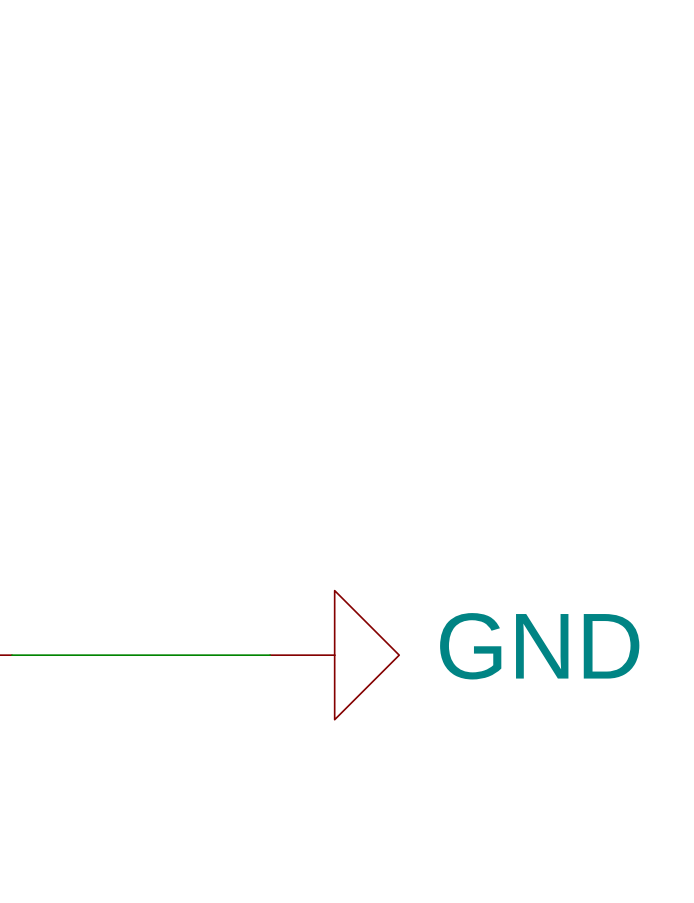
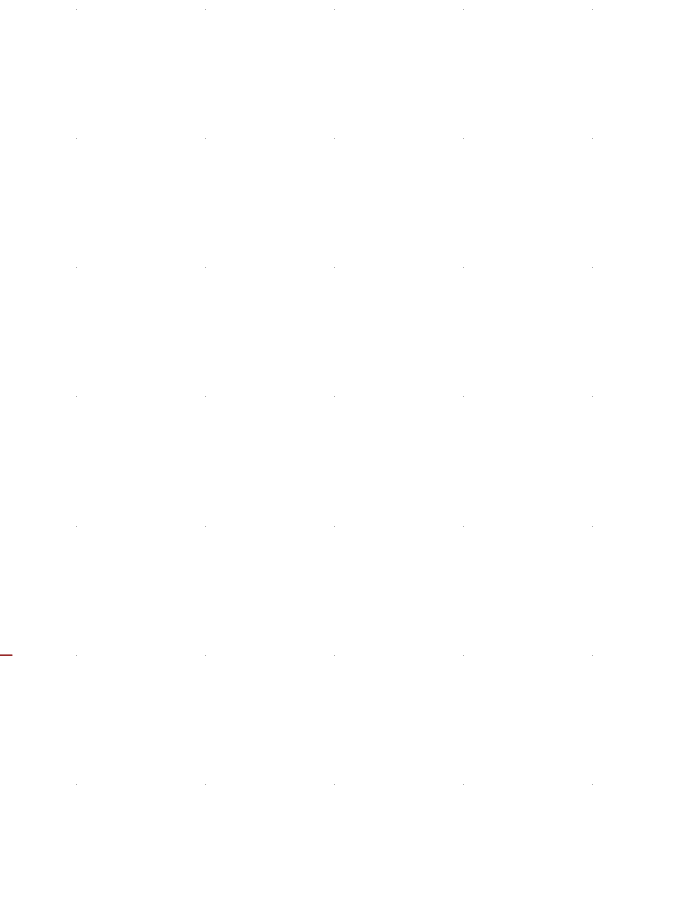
wire: (11, 655) (270, 655) -> none
power symbol: GND (334, 655) -> none

